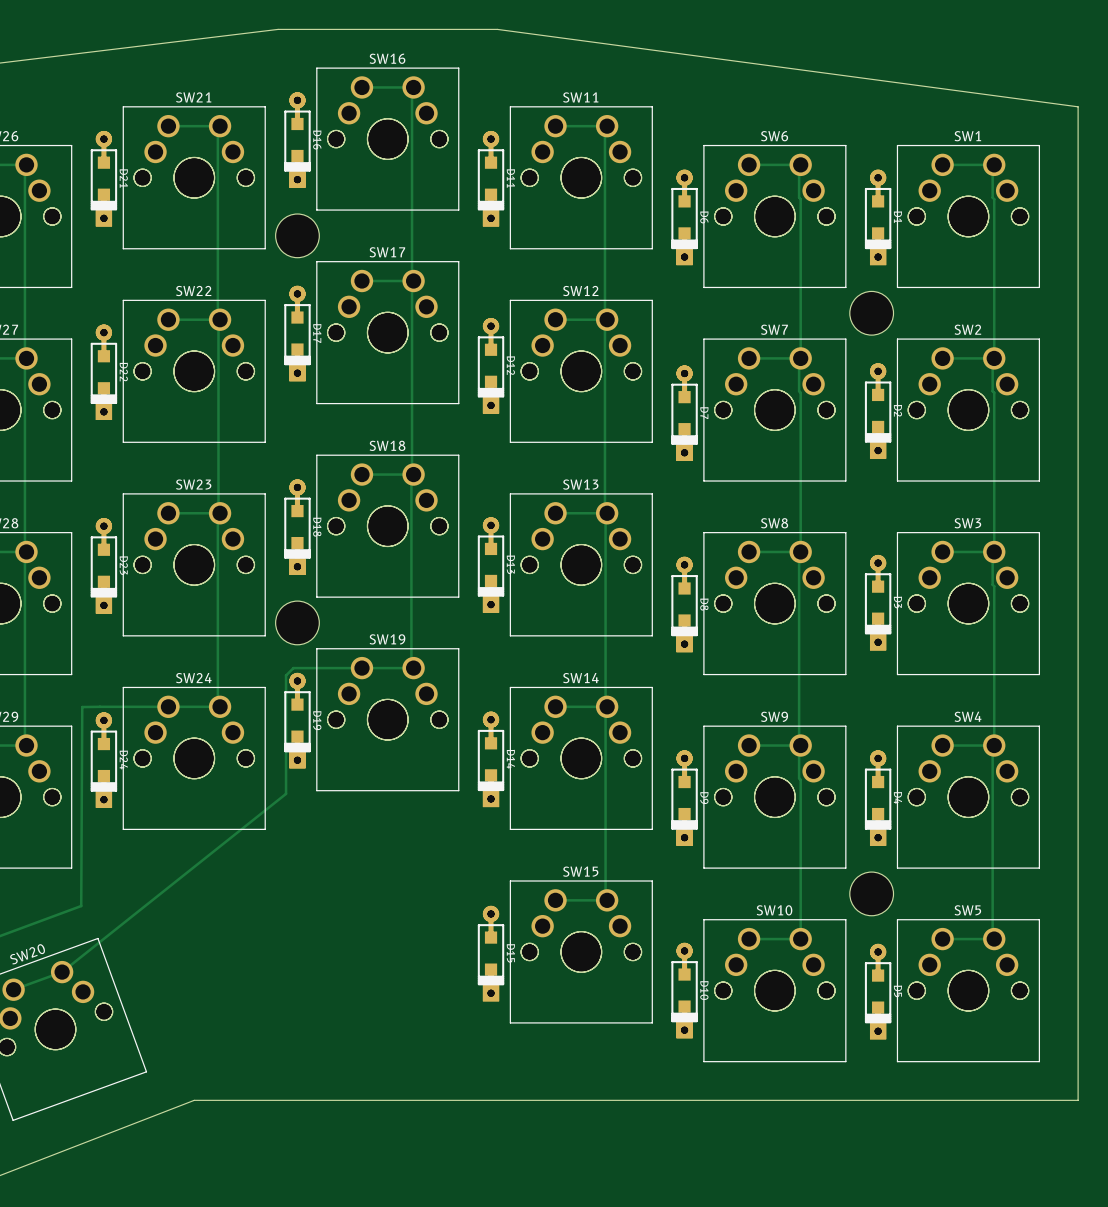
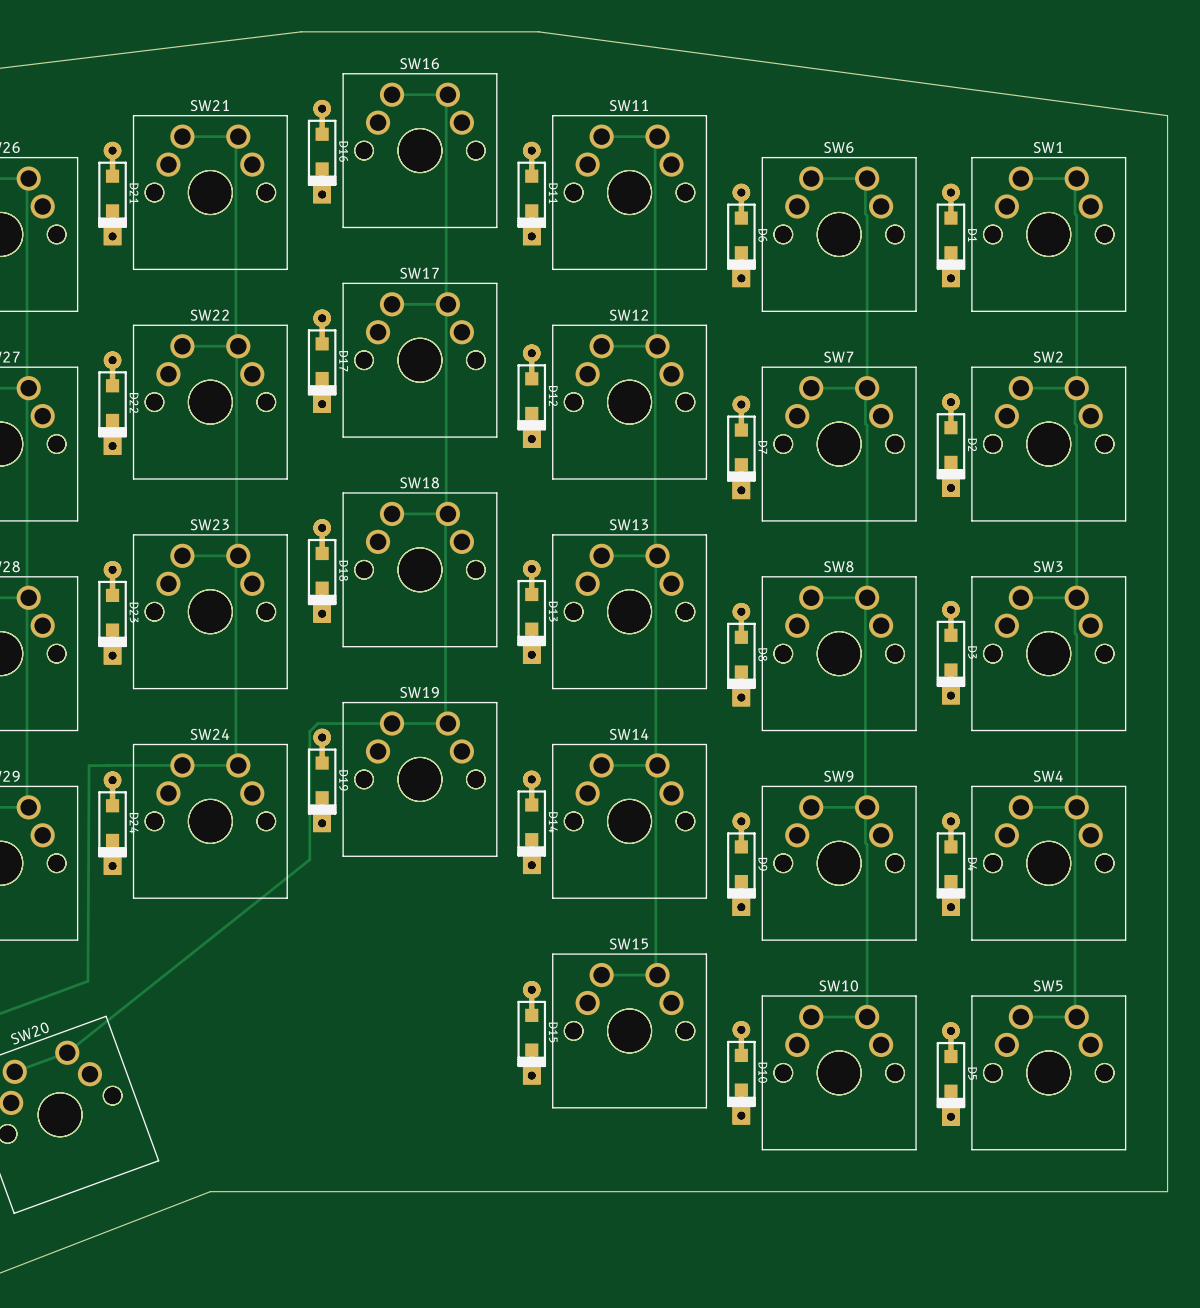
part: (297, 235) -> none
part: (871, 313) -> none
part: (297, 622) -> none
part: (871, 893) -> none

